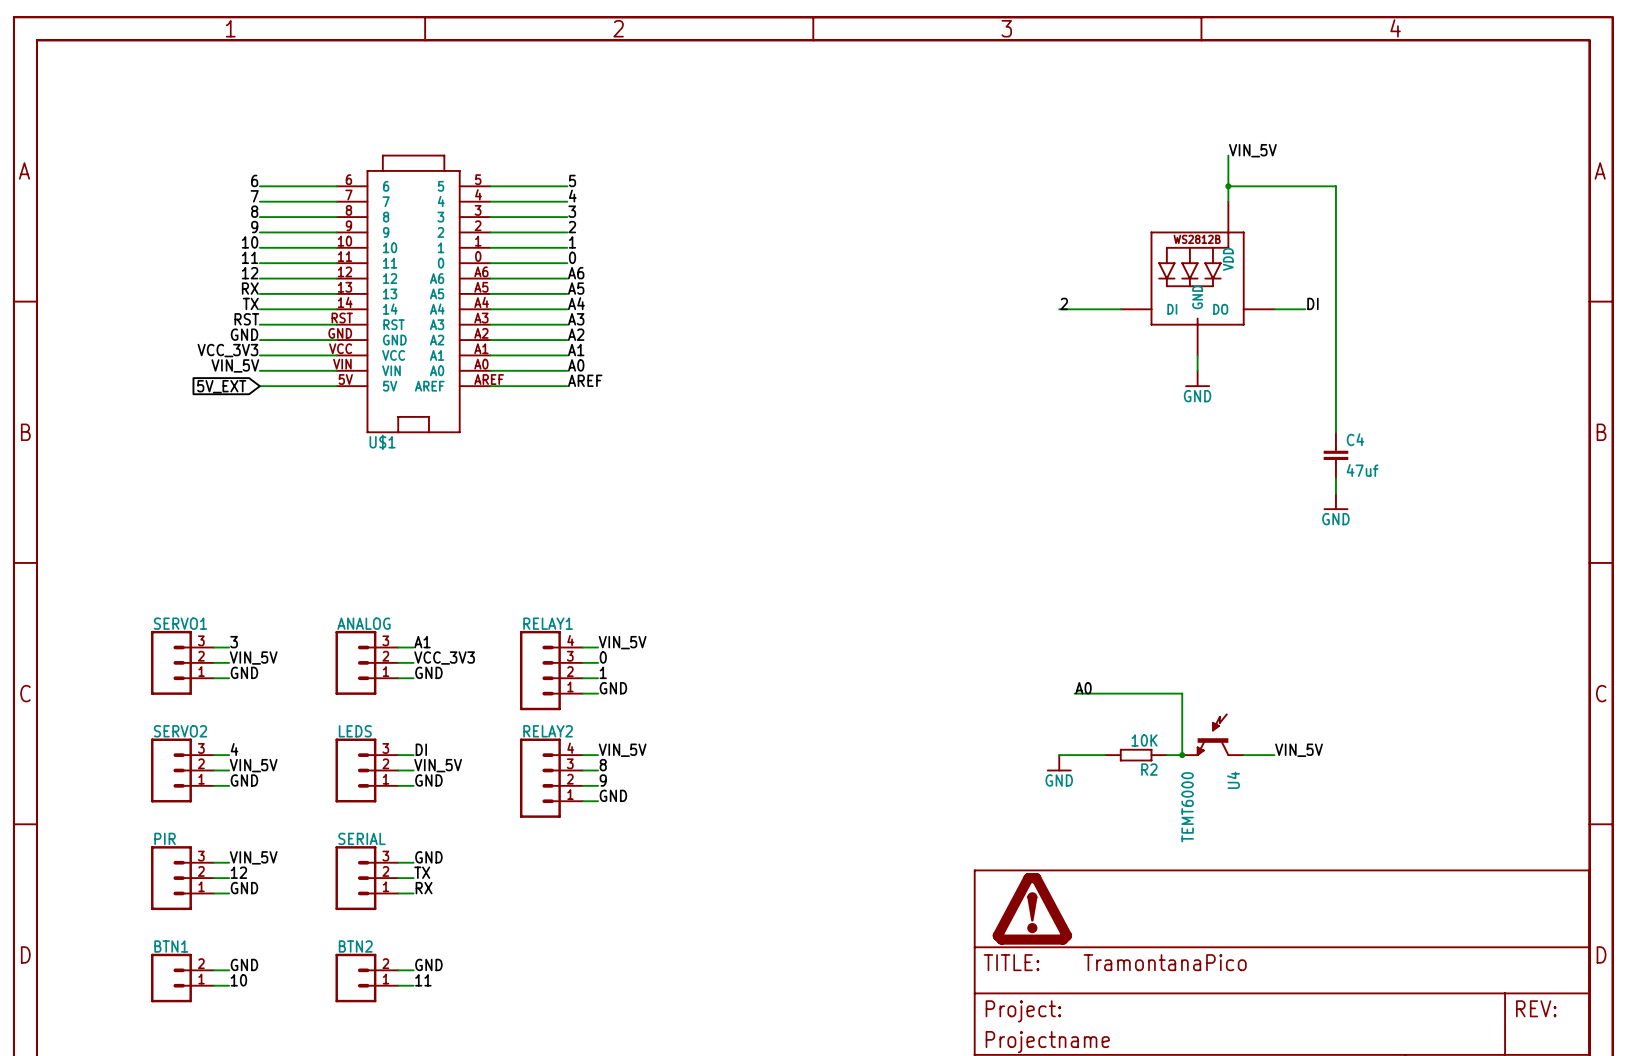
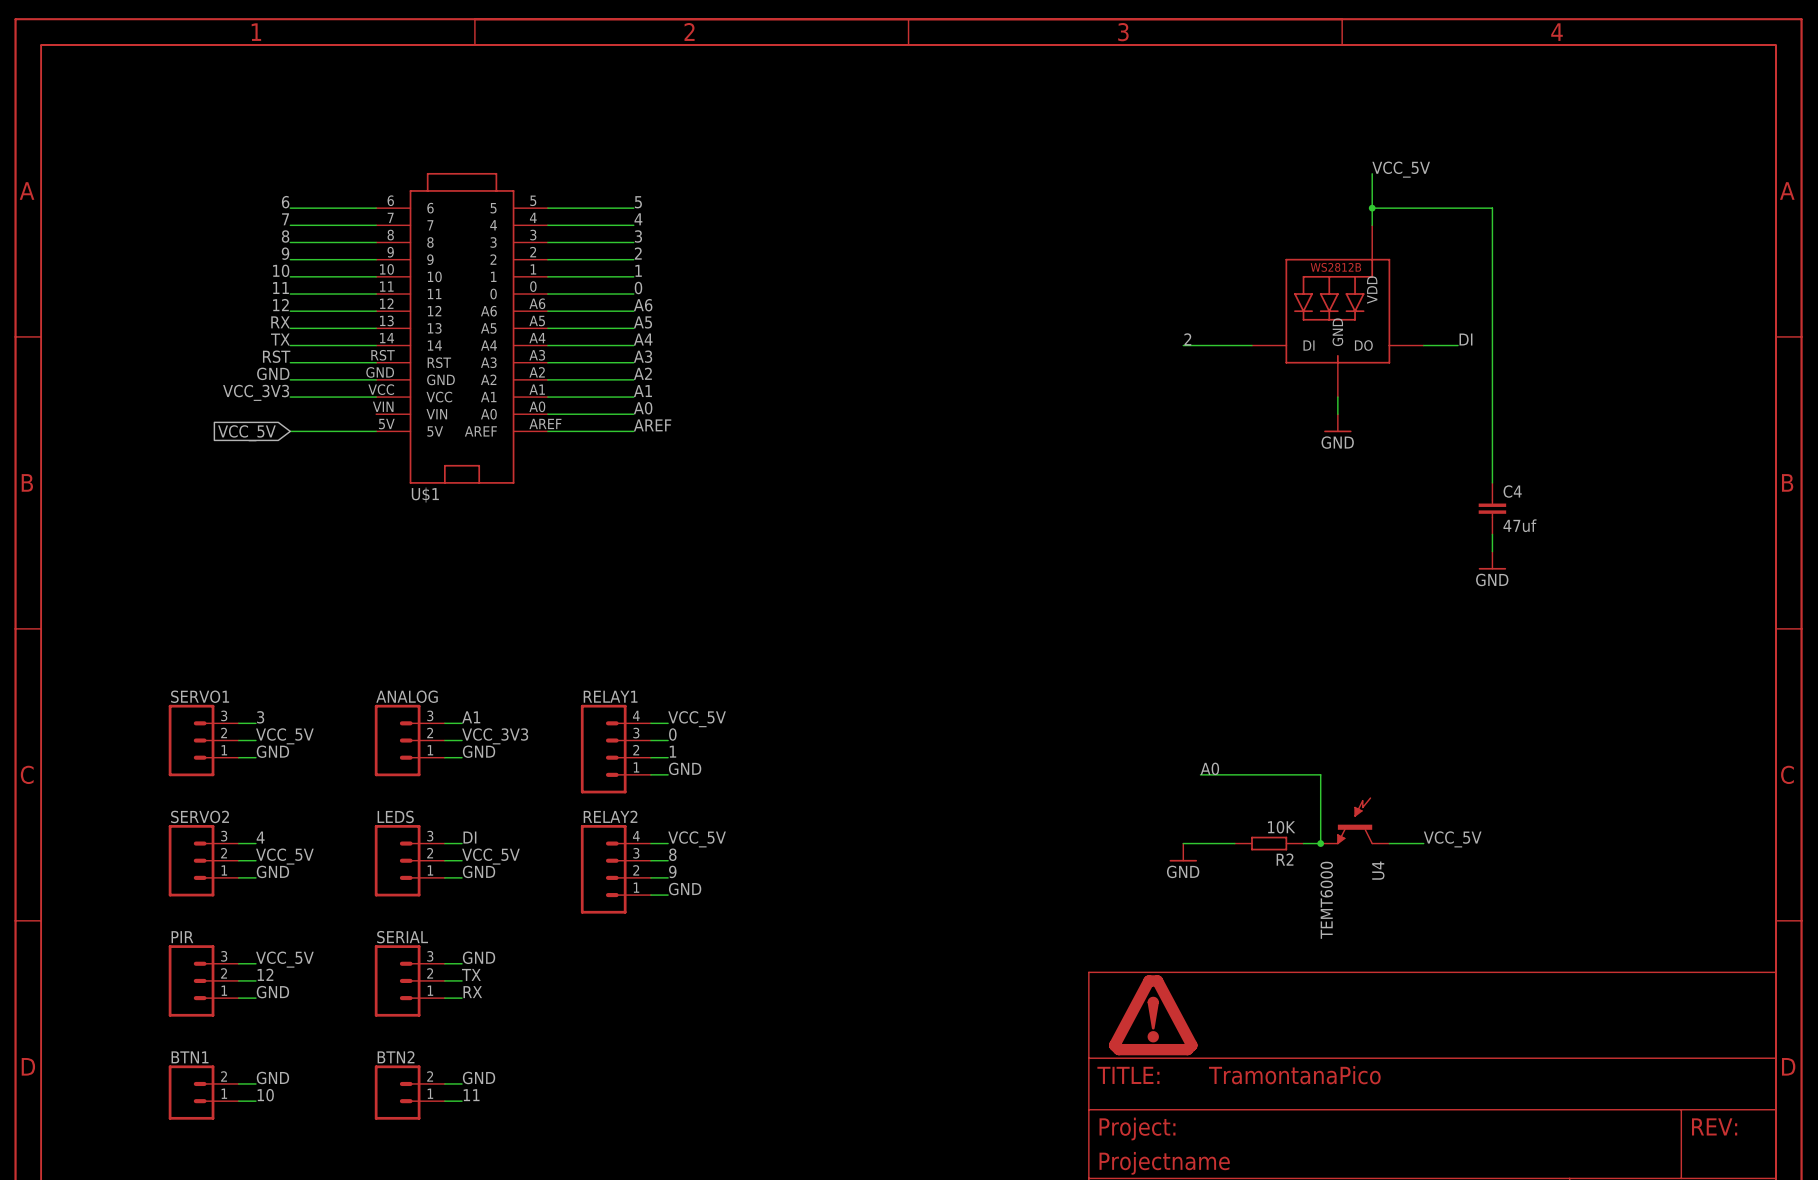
label: VIN_5V (1252, 150) -> VCC_5V (1401, 169)
label: VIN_5V (235, 365) -> none
wire: (259, 370) (336, 370) -> none
global label: 5V_EXT (221, 386) -> VCC_5V (246, 433)
label: VIN_5V (622, 642) -> VCC_5V (697, 719)
label: VIN_5V (253, 658) -> VCC_5V (284, 736)
label: VIN_5V (622, 750) -> VCC_5V (697, 839)
label: VIN_5V (1299, 750) -> VCC_5V (1452, 839)
label: VIN_5V (253, 765) -> VCC_5V (284, 856)
label: VIN_5V (438, 765) -> VCC_5V (490, 856)
label: VIN_5V (253, 857) -> VCC_5V (284, 959)

